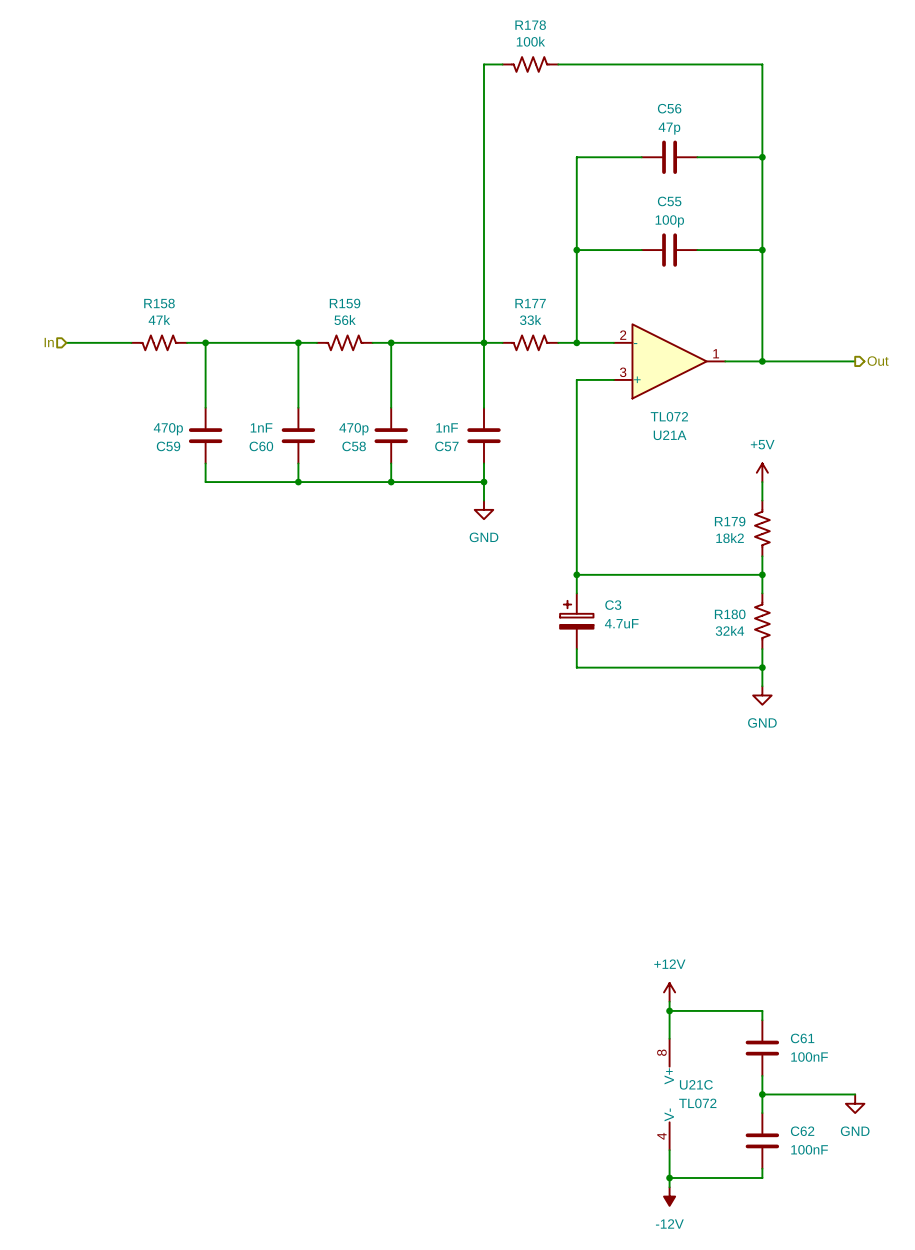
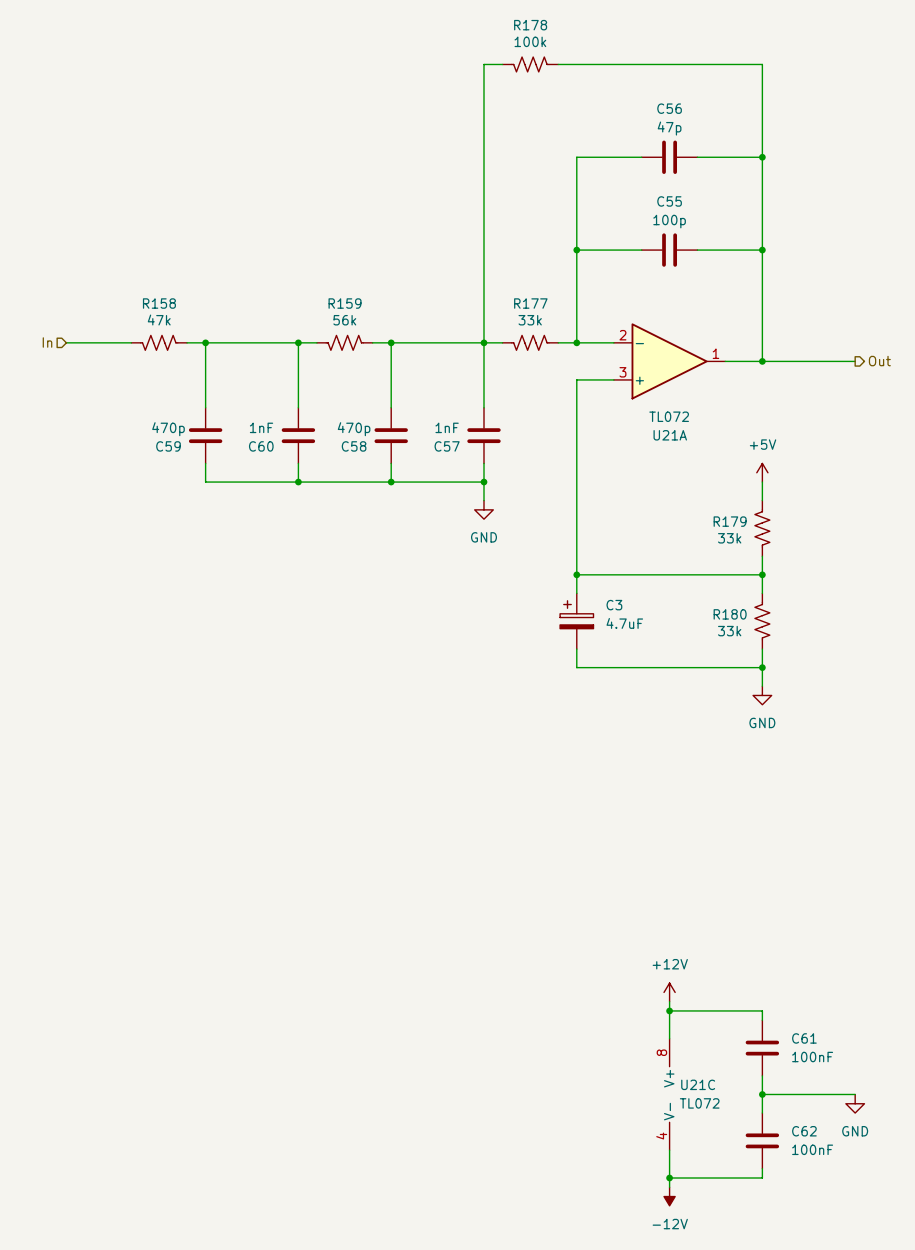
R179 value: 18k2 (730, 538) -> 33k (729, 538)
R180 value: 32k4 (729, 630) -> 33k (729, 631)

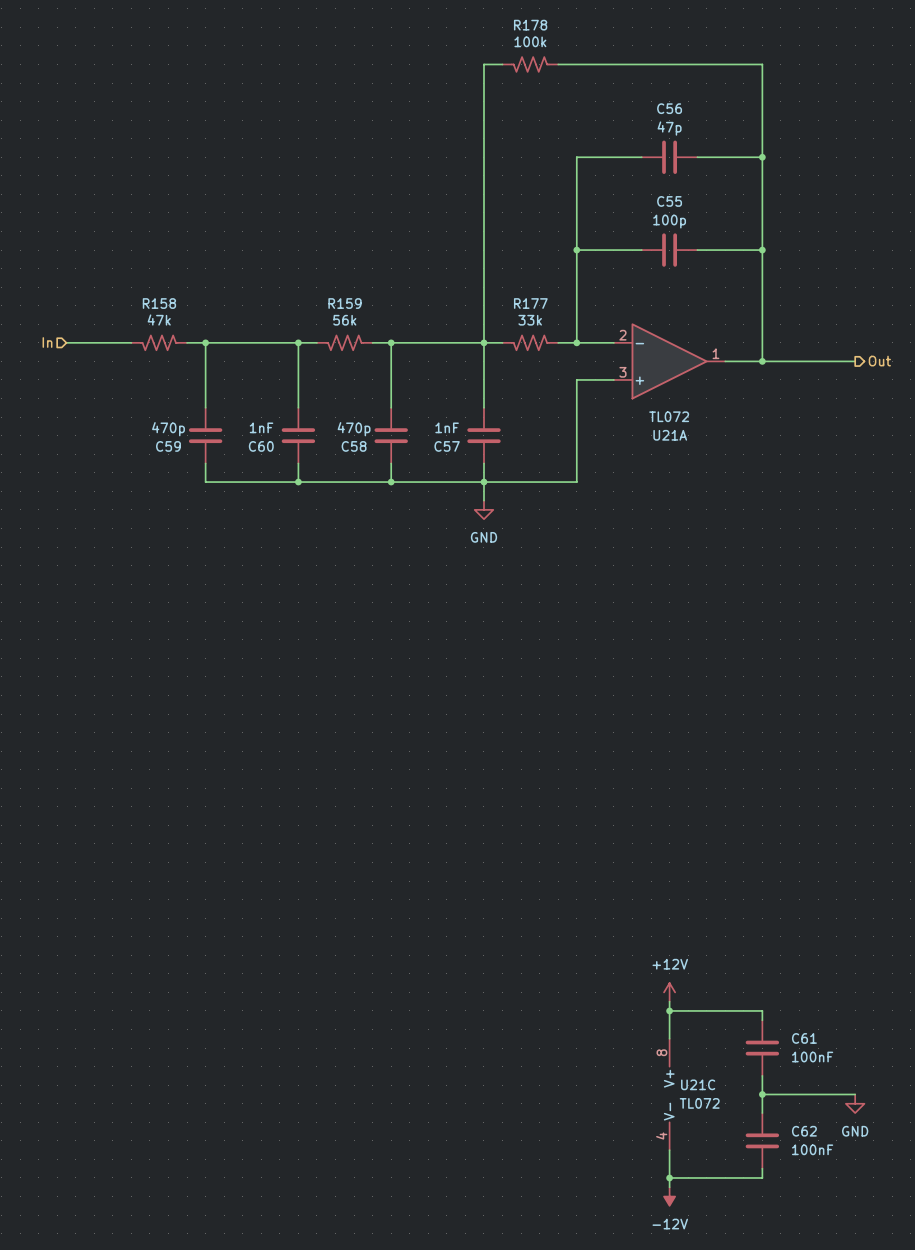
power symbol: +5V (762, 472) -> none
wire: (576, 482) (576, 593) -> (576, 482) (483, 482)
wire: (762, 482) (762, 500) -> none
R179: 33k (762, 528) -> none
wire: (762, 556) (762, 593) -> none
wire: (576, 574) (762, 574) -> none
junction: (576, 574) -> none
junction: (762, 574) -> none
C3: 4.7uF (576, 621) -> none
R180: 33k (762, 621) -> none
wire: (576, 649) (576, 667) (762, 667) -> none
wire: (762, 649) (762, 686) -> none
junction: (762, 667) -> none
power symbol: GND (762, 695) -> none

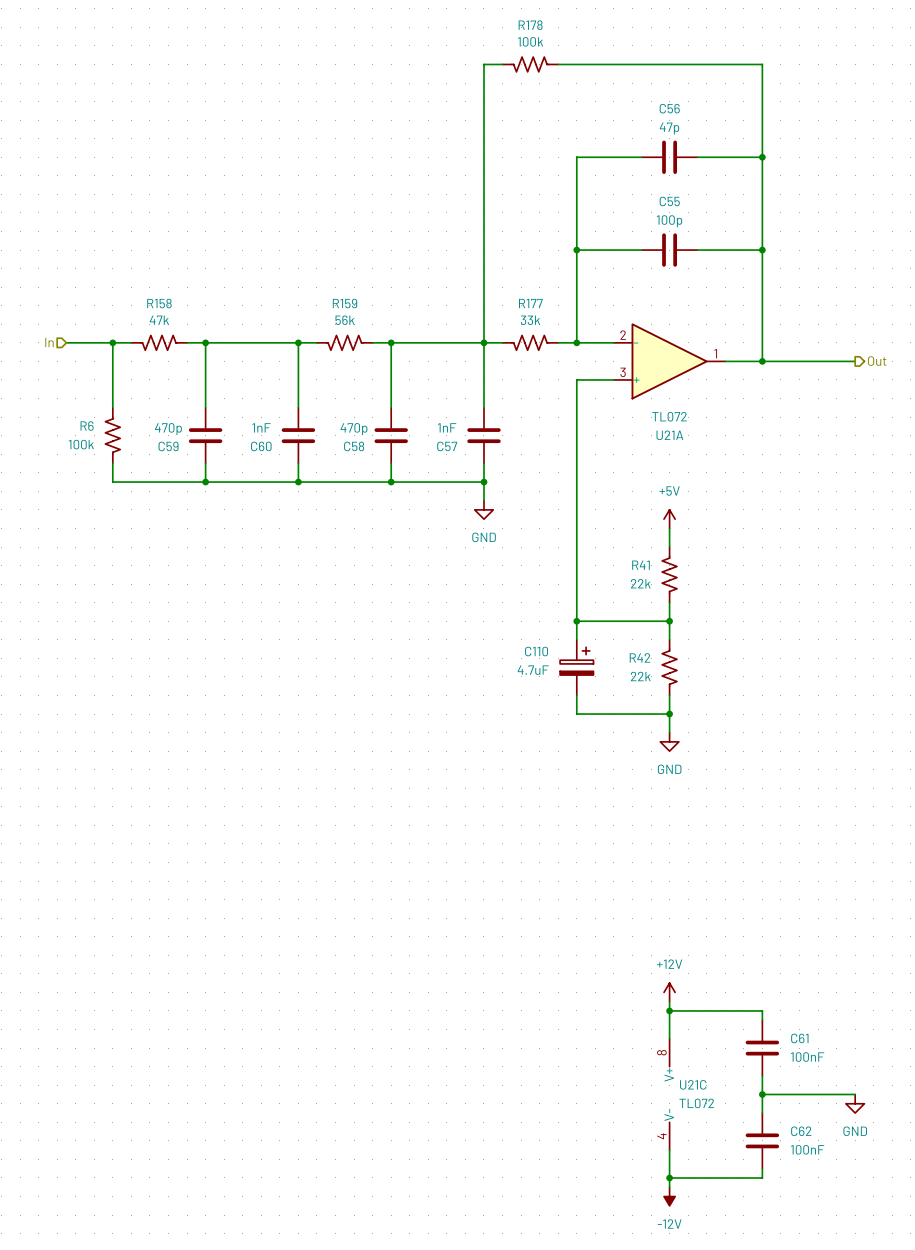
wire: none -> (112, 342) (112, 407)
junction: none -> (112, 342)
R6: none -> 100k (112, 435)
wire: none -> (112, 463) (112, 482) (205, 482)
junction: none -> (205, 482)
wire: (483, 482) (576, 482) -> (576, 639) (576, 482)
power symbol: none -> +5V (669, 519)
wire: none -> (669, 528) (669, 547)
R41: none -> 22k (669, 574)
wire: none -> (669, 602) (669, 639)
wire: none -> (576, 621) (669, 621)
junction: none -> (576, 621)
junction: none -> (669, 621)
C110: none -> 4.7uF (576, 667)
R42: none -> 22k (669, 667)
wire: none -> (576, 695) (576, 714) (669, 714)
wire: none -> (669, 695) (669, 732)
junction: none -> (669, 714)
power symbol: none -> GND (669, 741)

